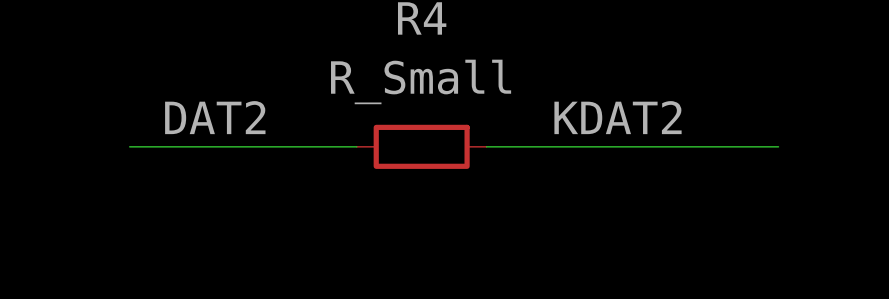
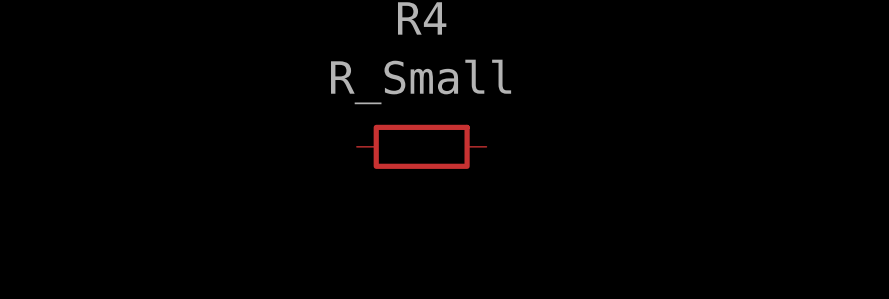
label: DAT2 (215, 117) -> none
label: KDAT2 (618, 117) -> none
wire: (129, 146) (356, 146) -> none
wire: (486, 146) (778, 146) -> none

